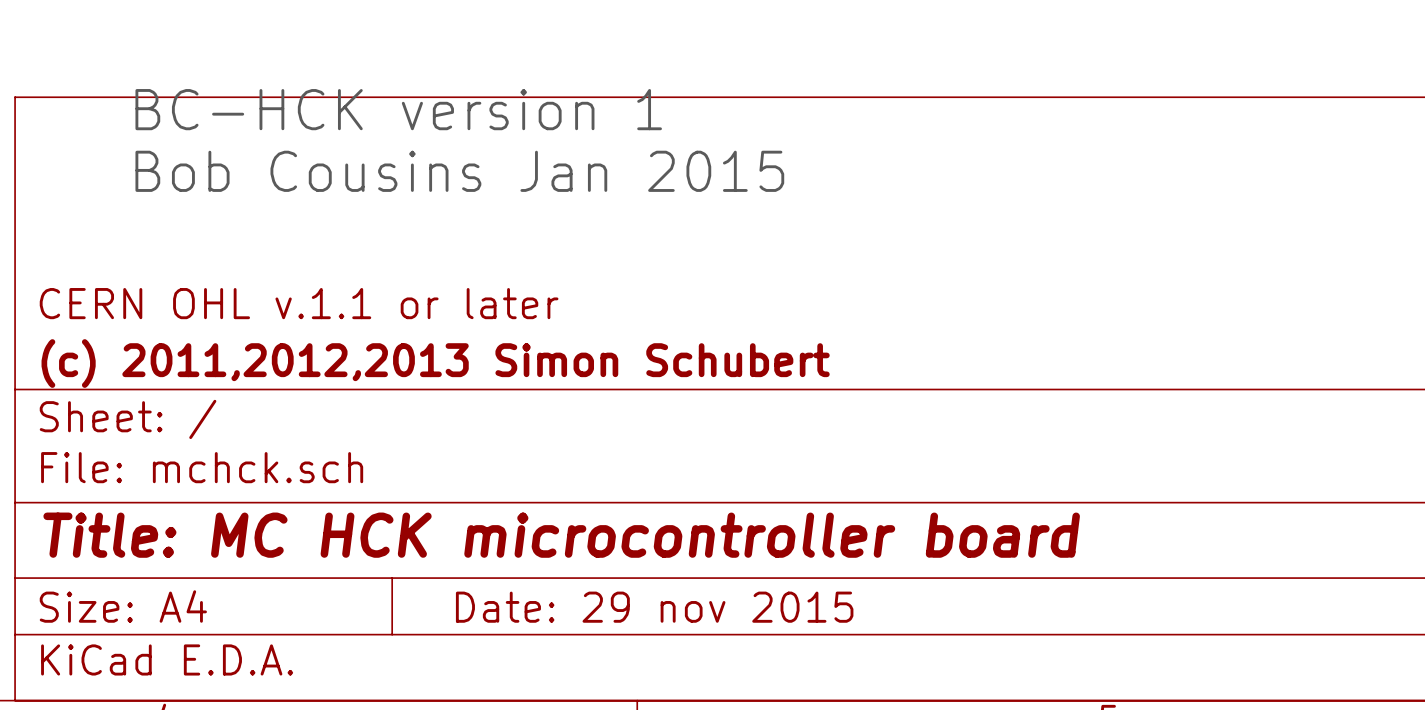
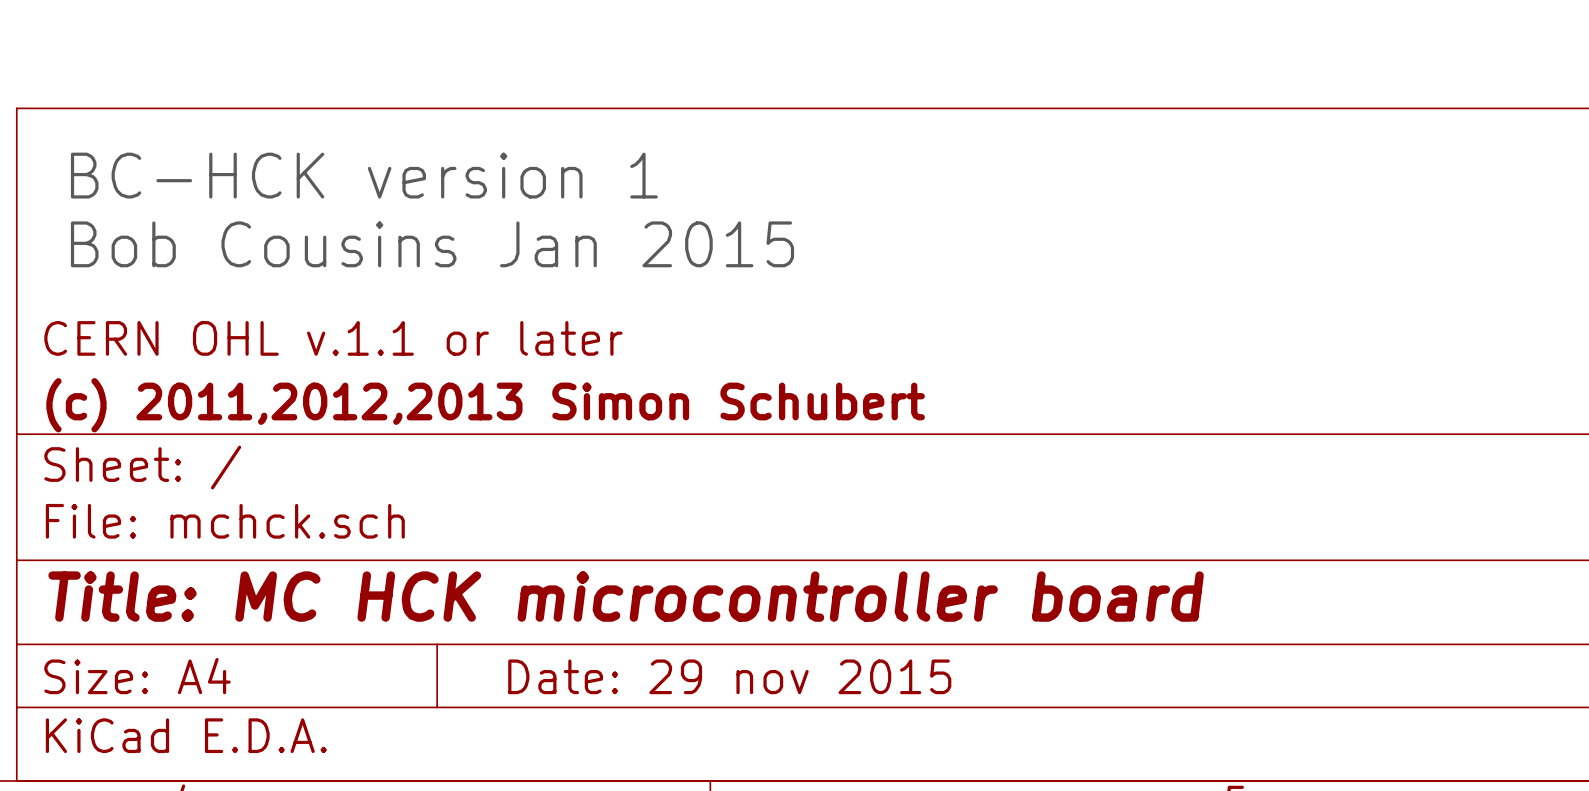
text position: BC-HCK version 1 (398, 109) -> BC-HCK version 1 (364, 175)
text position: Bob Cousins Jan 2015 (459, 171) -> Bob Cousins Jan 2015 (432, 244)

